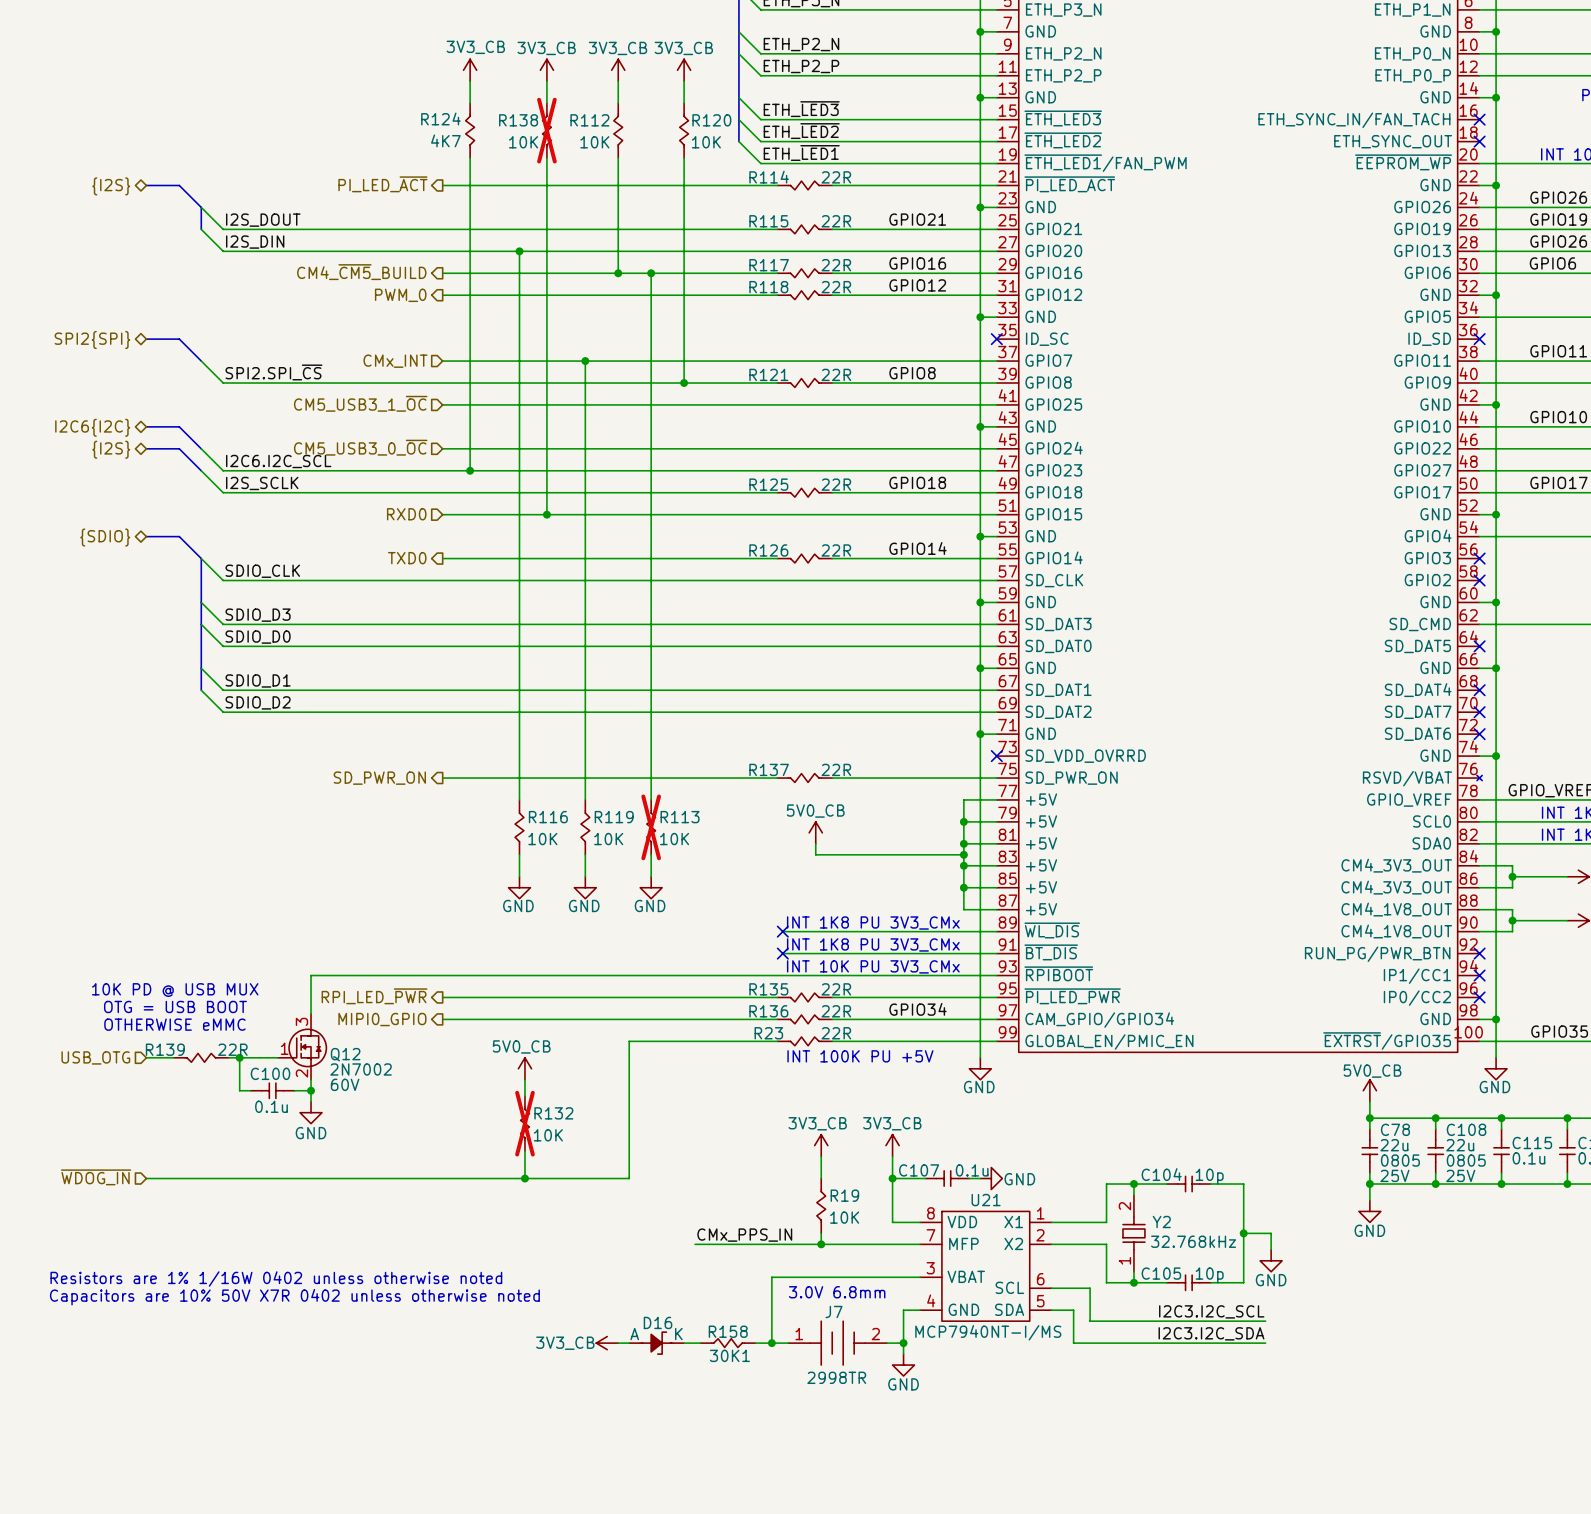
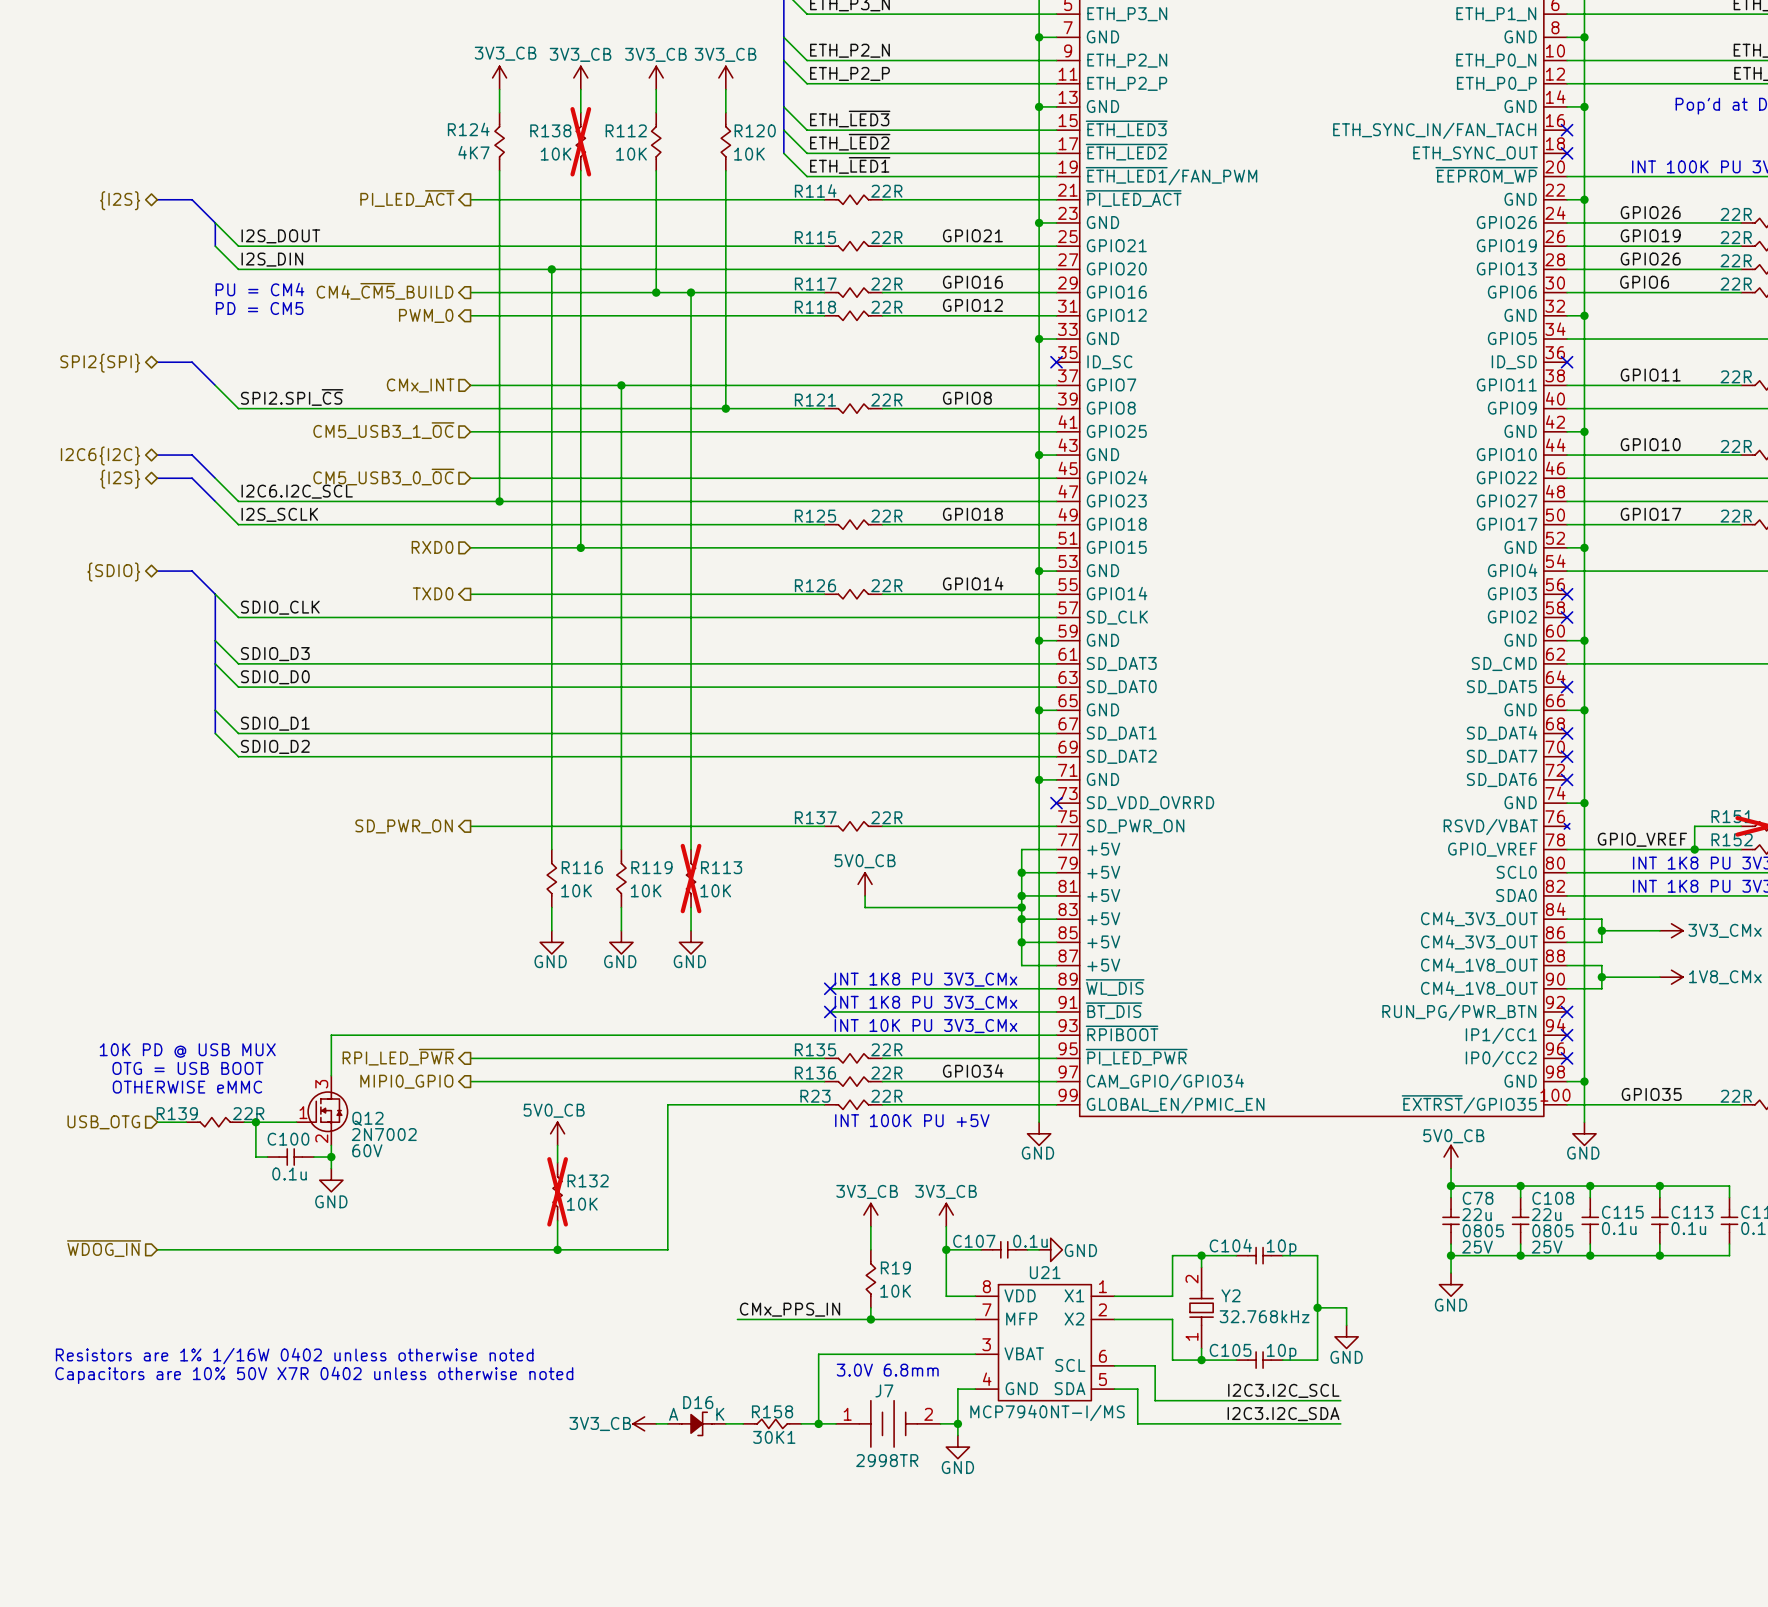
text: none -> PU = CM4 (259, 289)
text: none -> PD = CM5 (259, 308)

